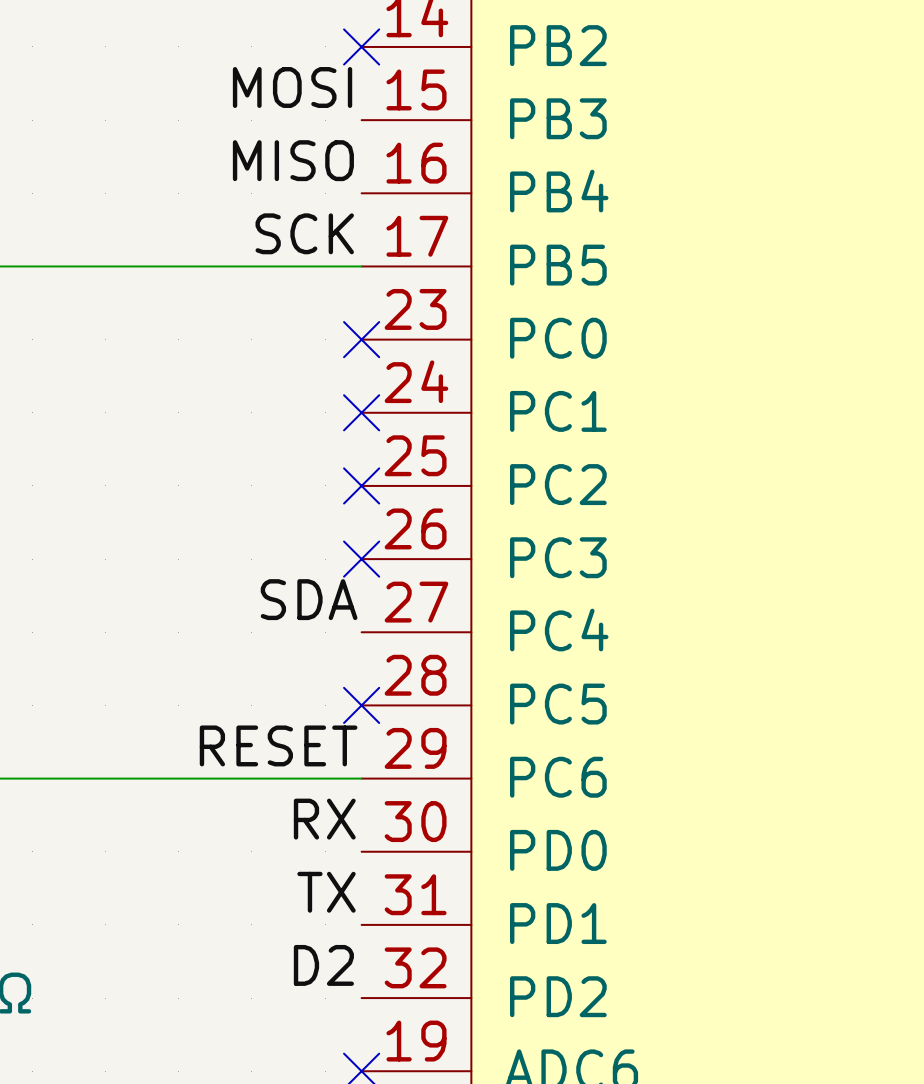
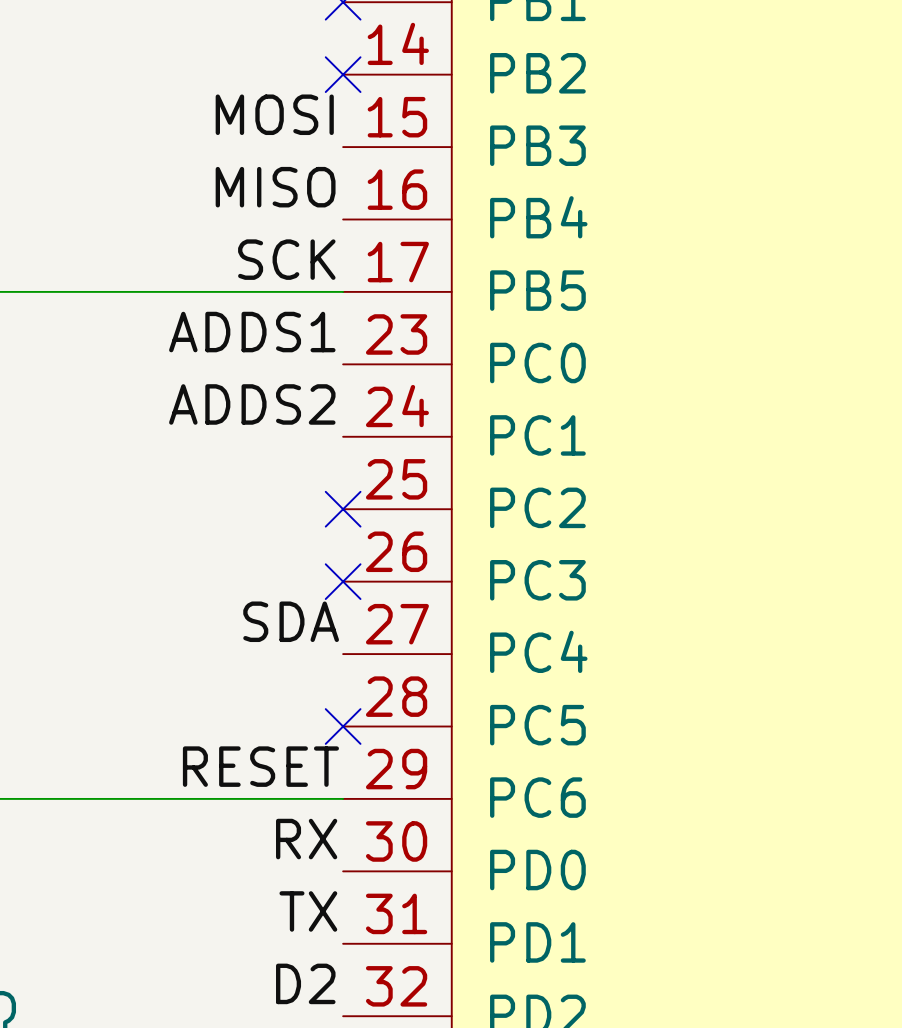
label: none -> ADDS1 (252, 332)
no-connect mark: (361, 339) -> none
label: none -> ADDS2 (252, 404)
no-connect mark: (361, 412) -> none

